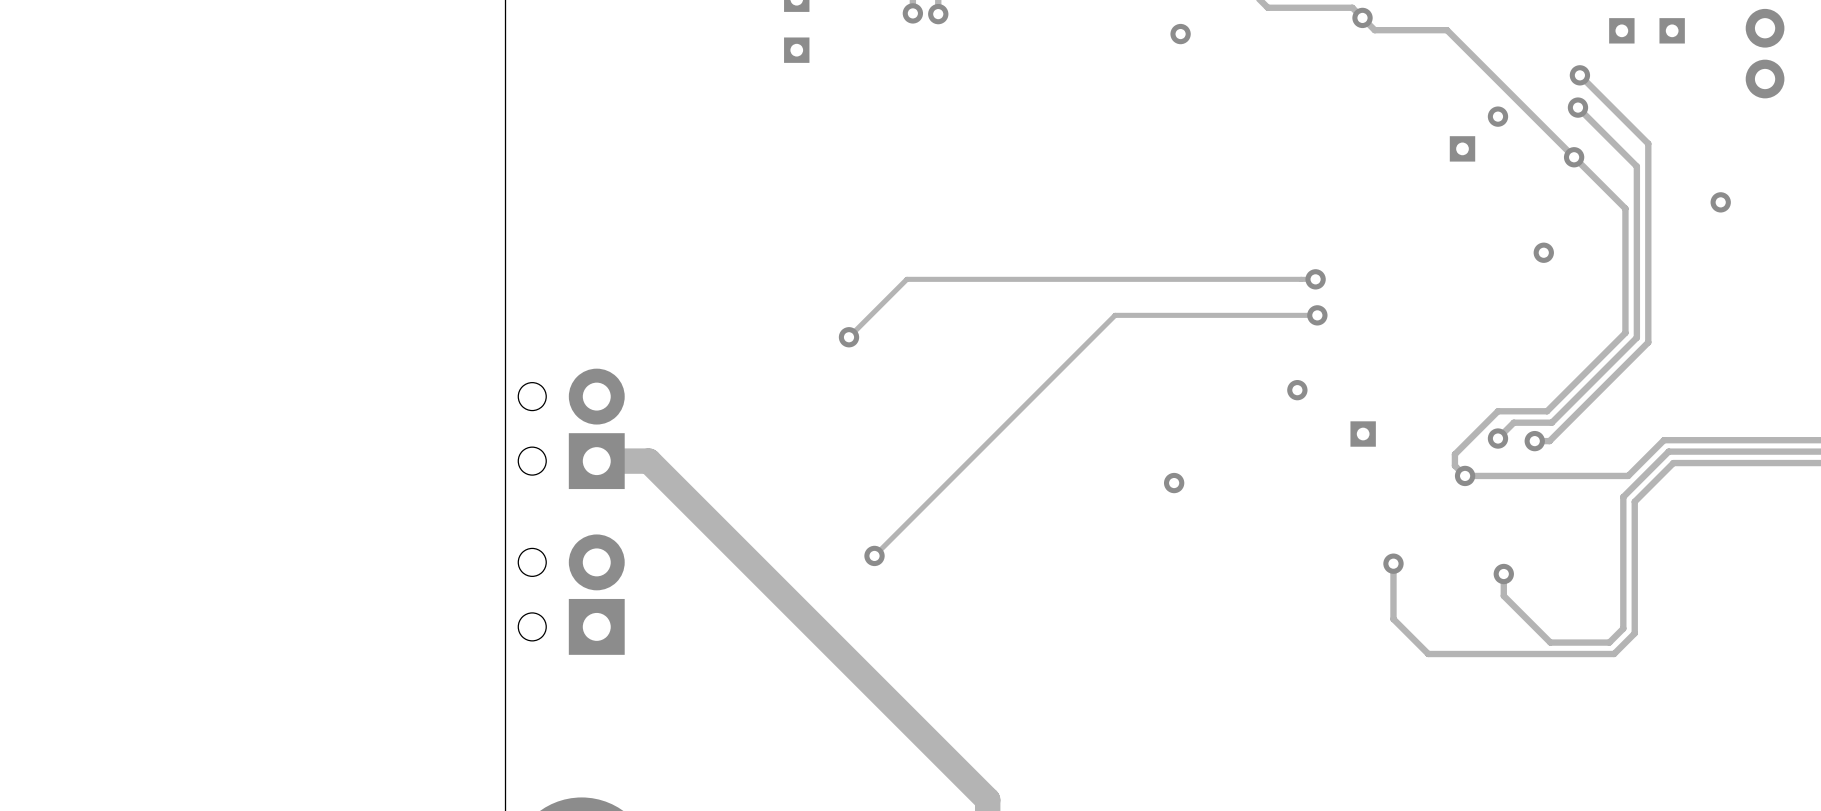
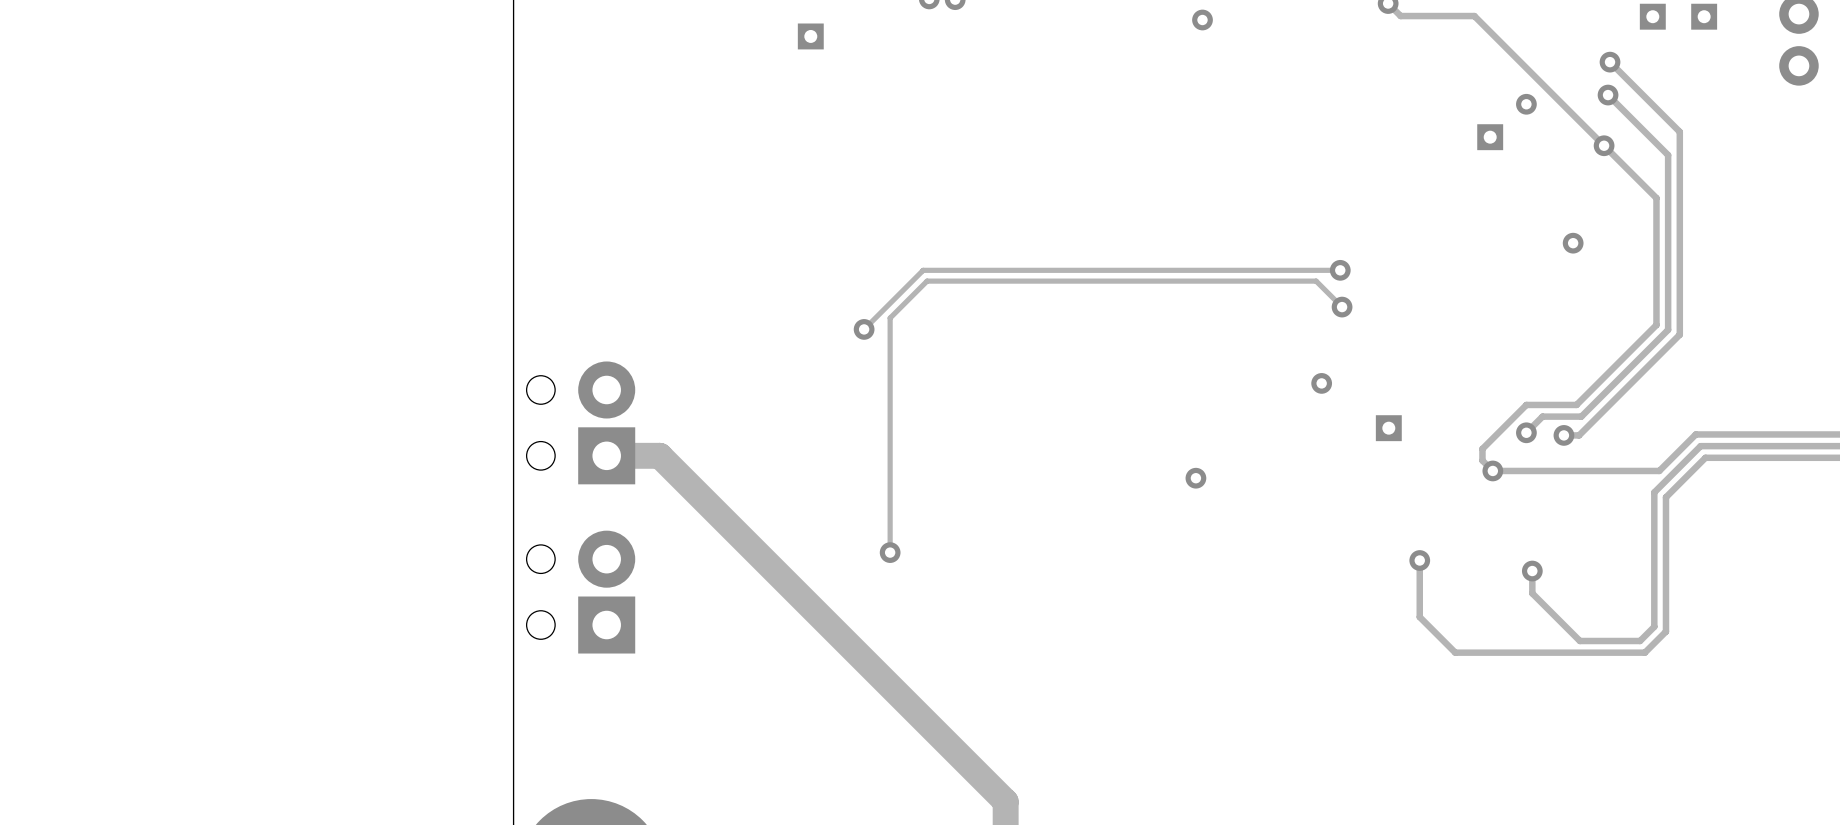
via: (1720, 202) -> none
track: (1317, 315) (1115, 315) (874, 555) -> (1342, 307) (1316, 281) (927, 281) (890, 318) (890, 552)

